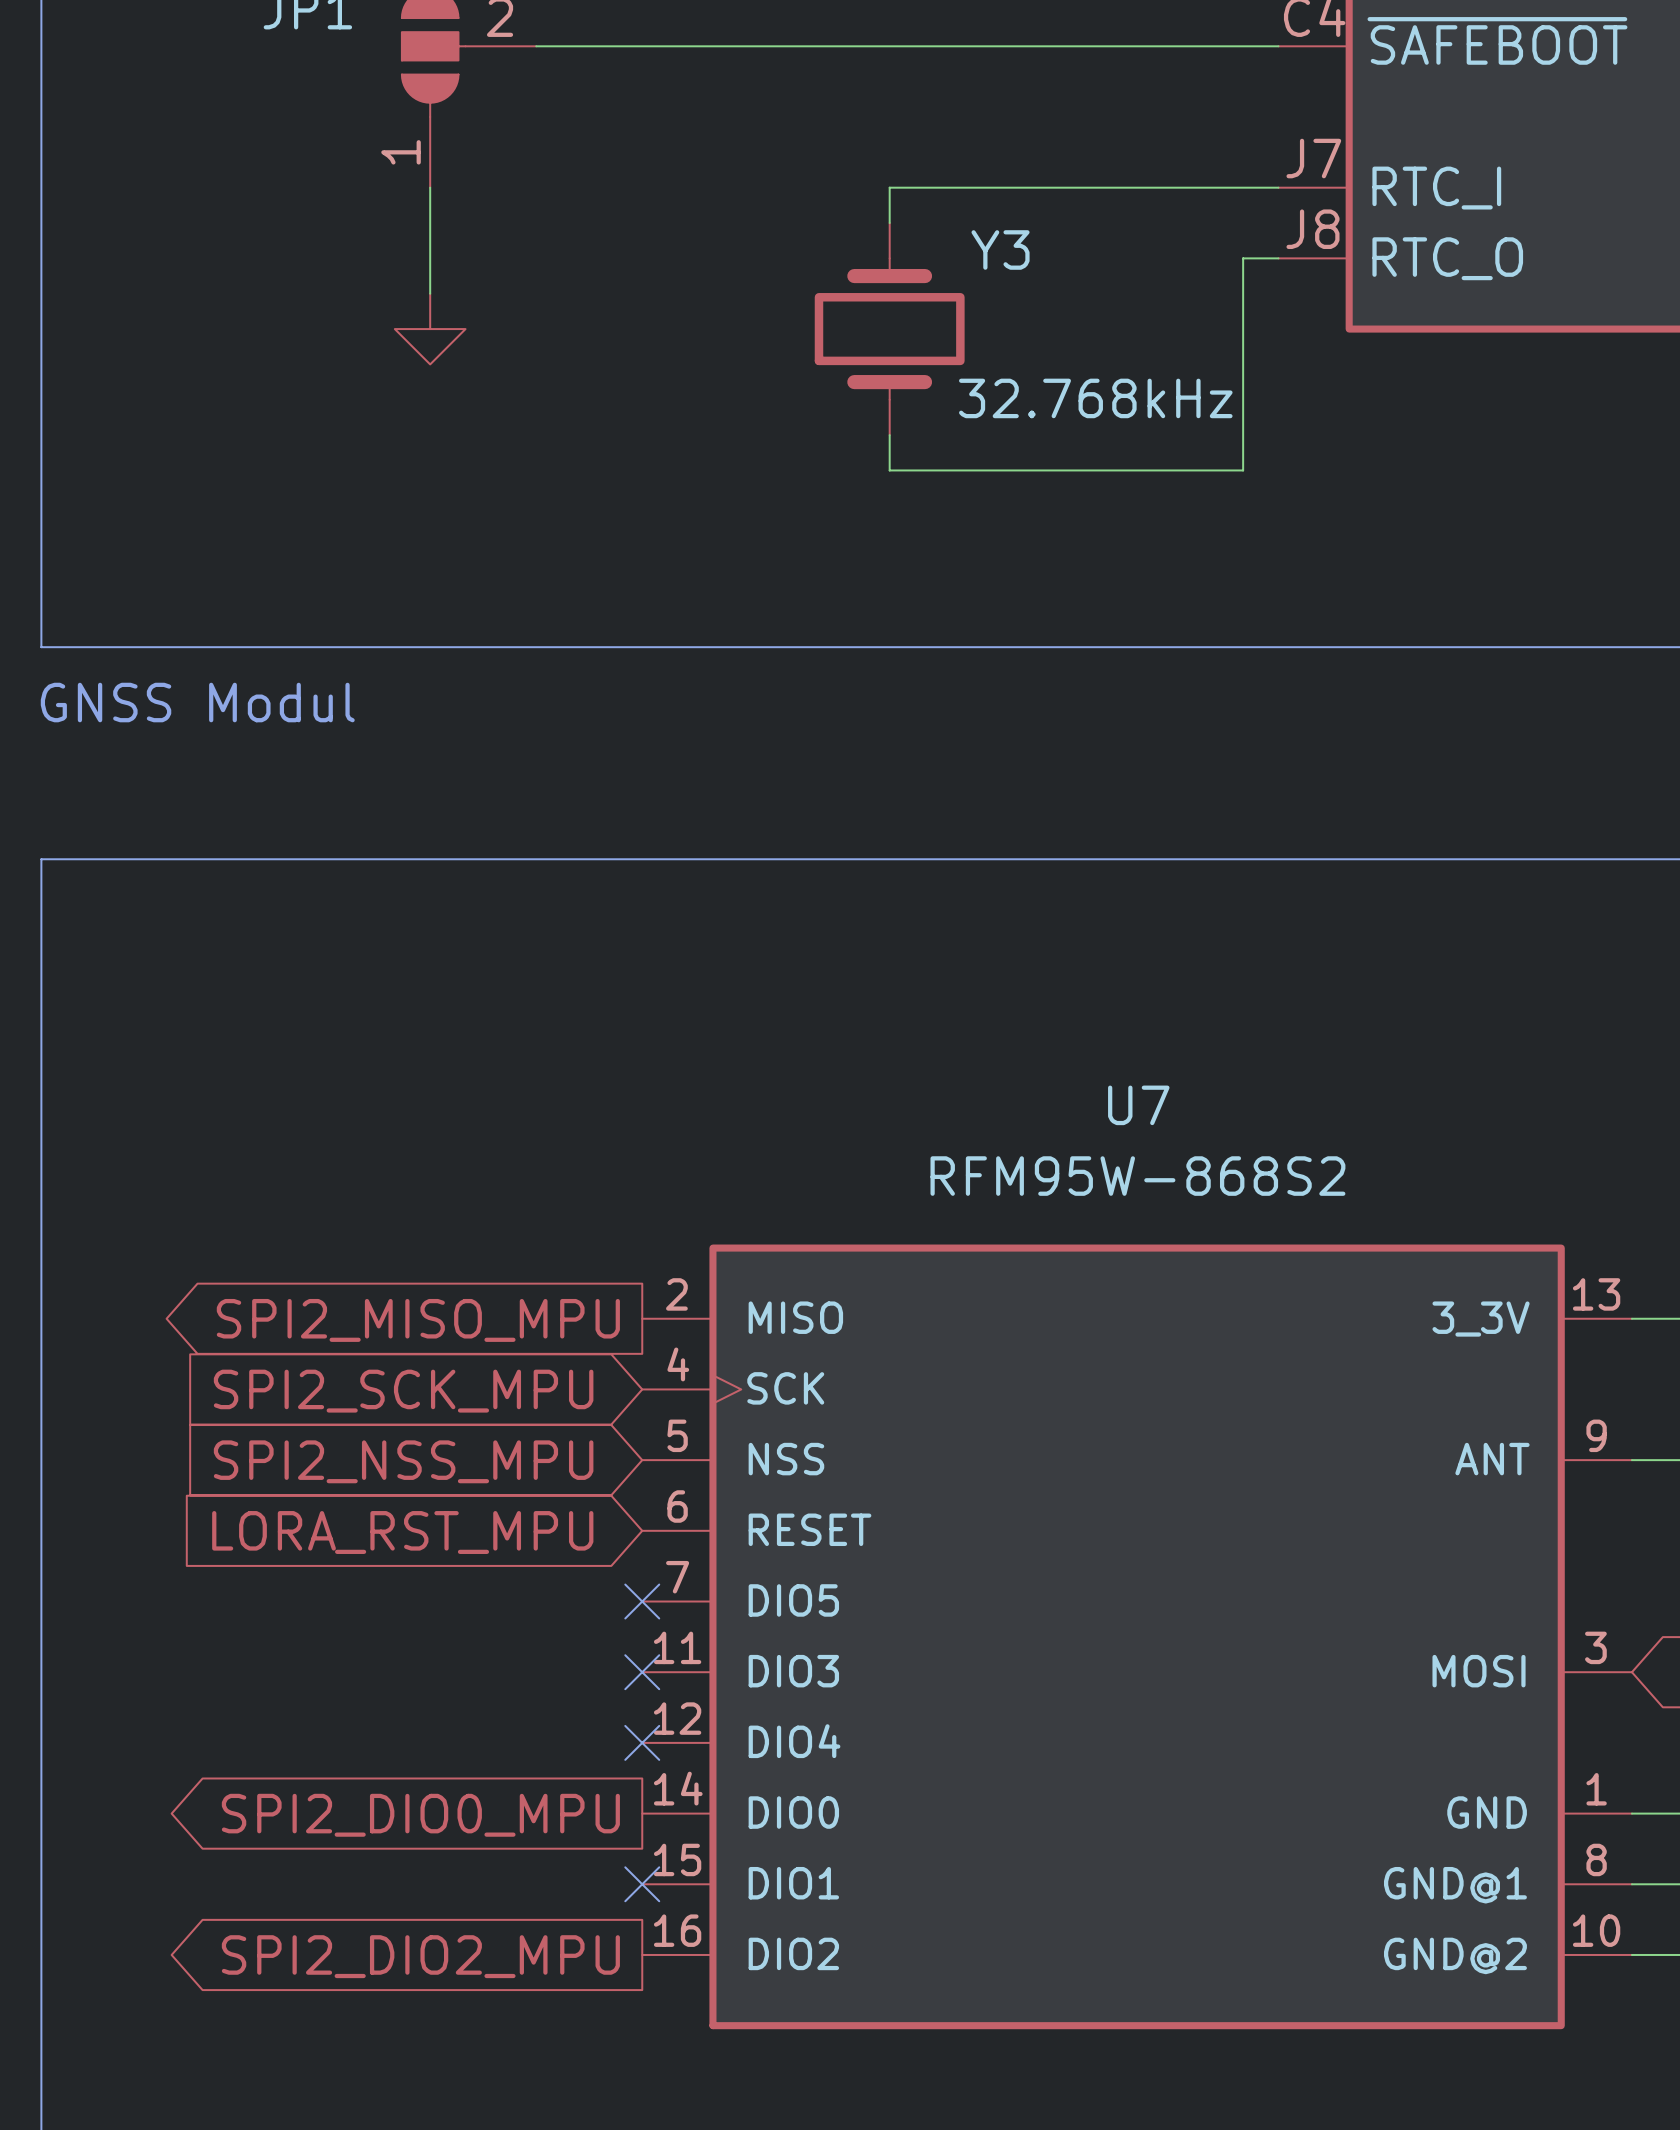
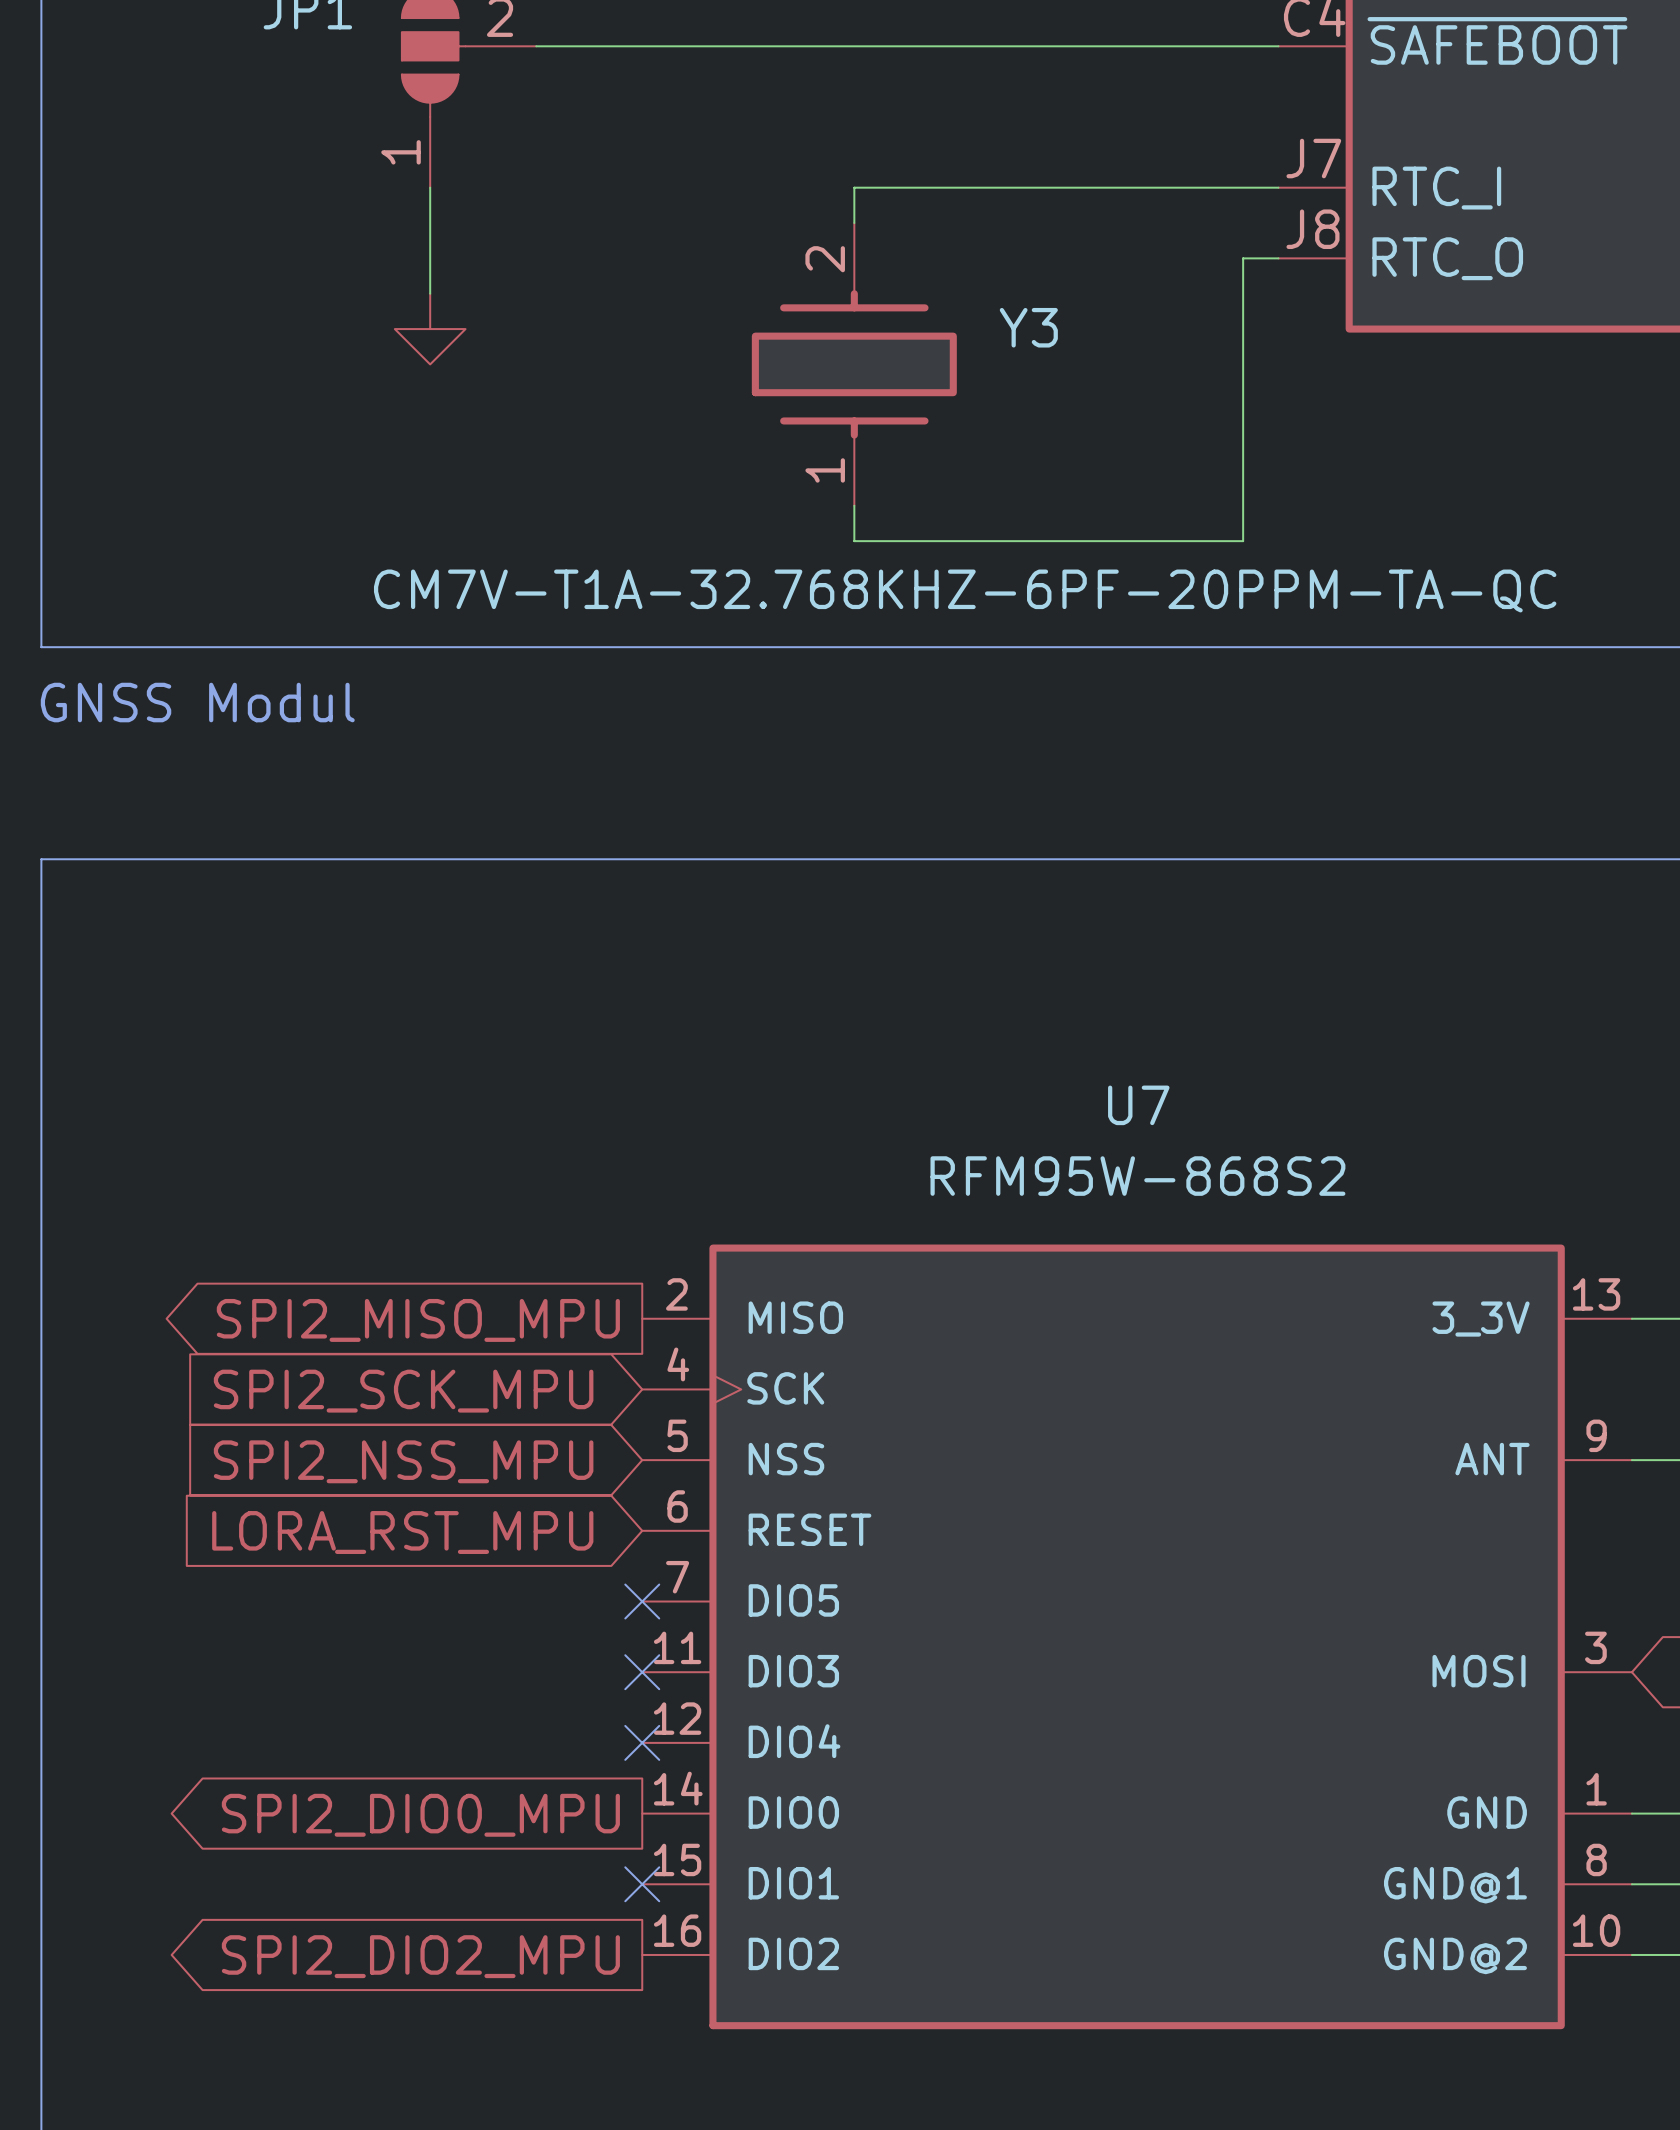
wire: (889, 187) (889, 223) -> (889, 187) (854, 187) (854, 223)
Y3 symbol: [814, 223, 965, 436] -> [751, 223, 957, 506]
Y3 name position: Y3 (1000, 249) -> Y3 (1028, 327)
Y3 value: 32.768kHz (1095, 398) -> CM7V-T1A-32.768KHZ-6PF-20PPM-TA-QC (965, 590)
wire: (889, 435) (889, 470) (1243, 470) -> (854, 505) (854, 541) (1243, 541) (1243, 470)

